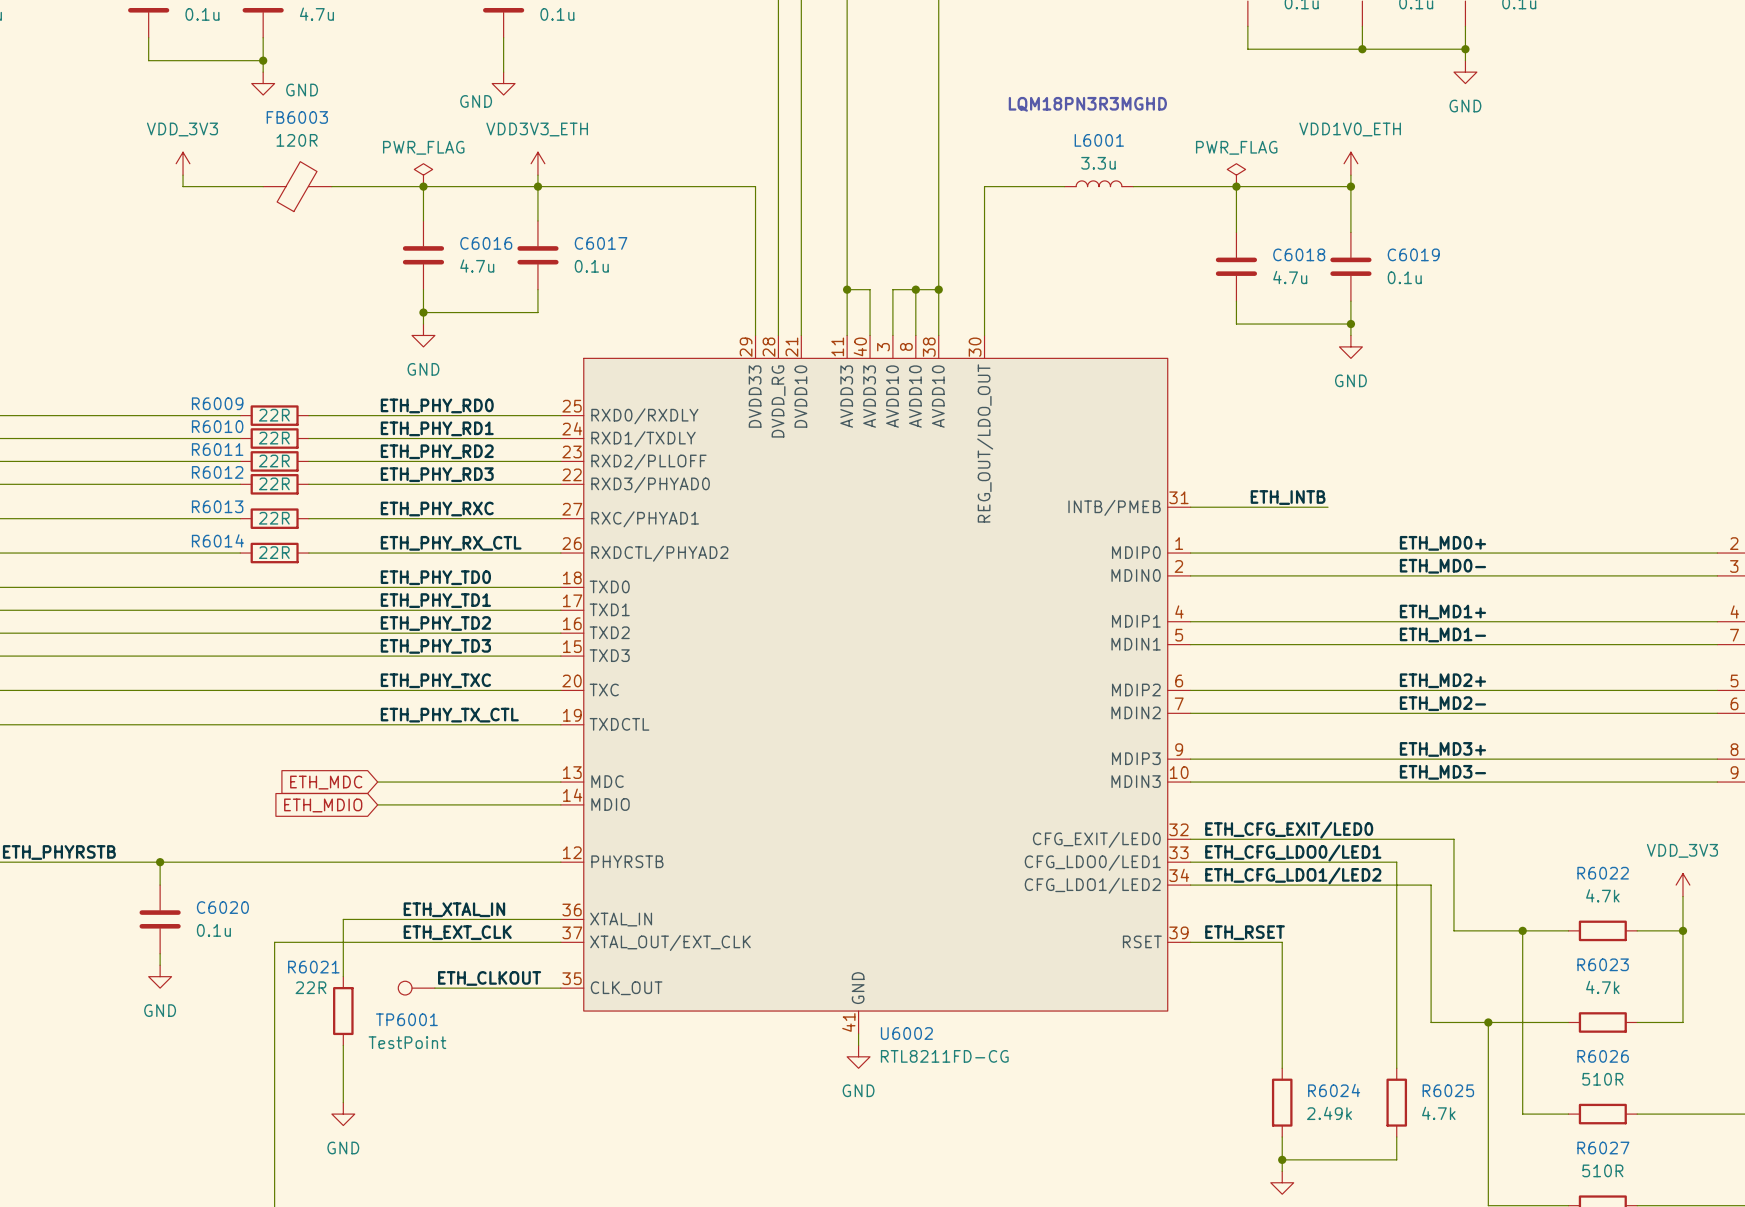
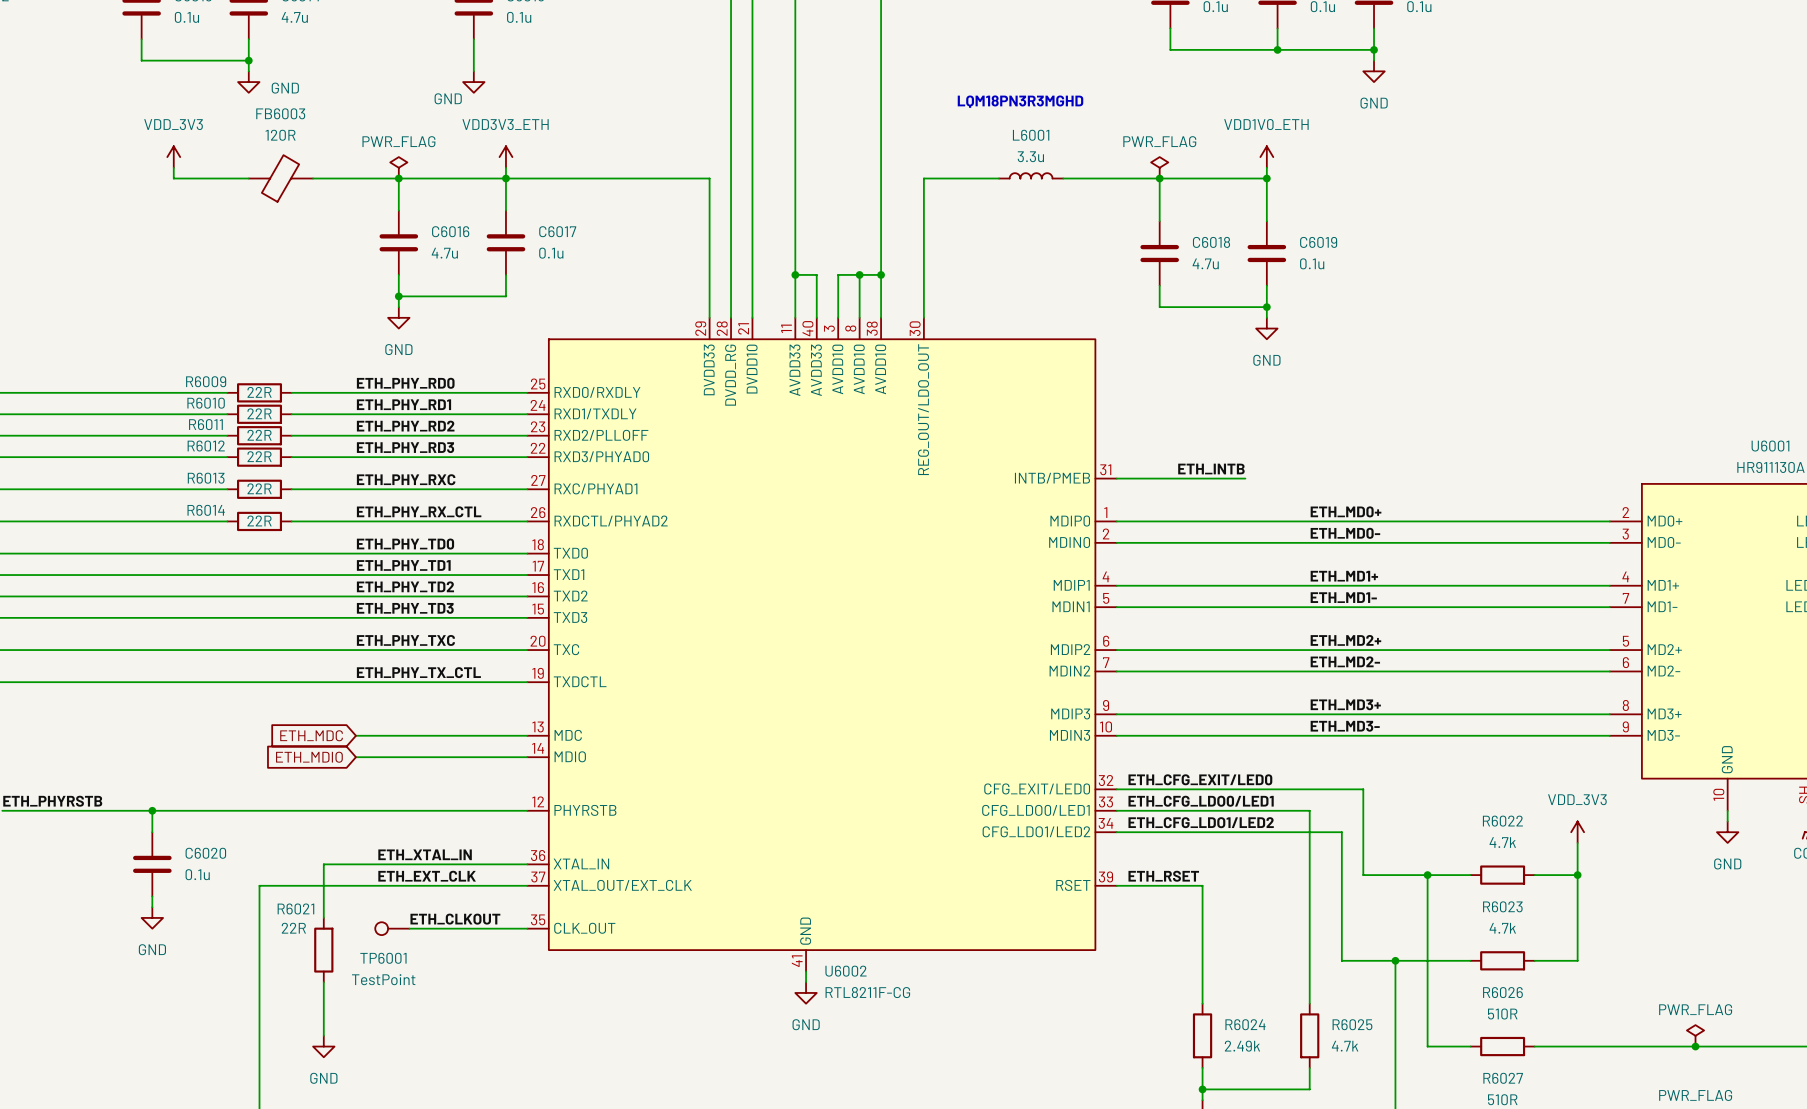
U6002 value: RTL8211FD-CG (944, 1056) -> RTL8211F-CG (867, 992)

